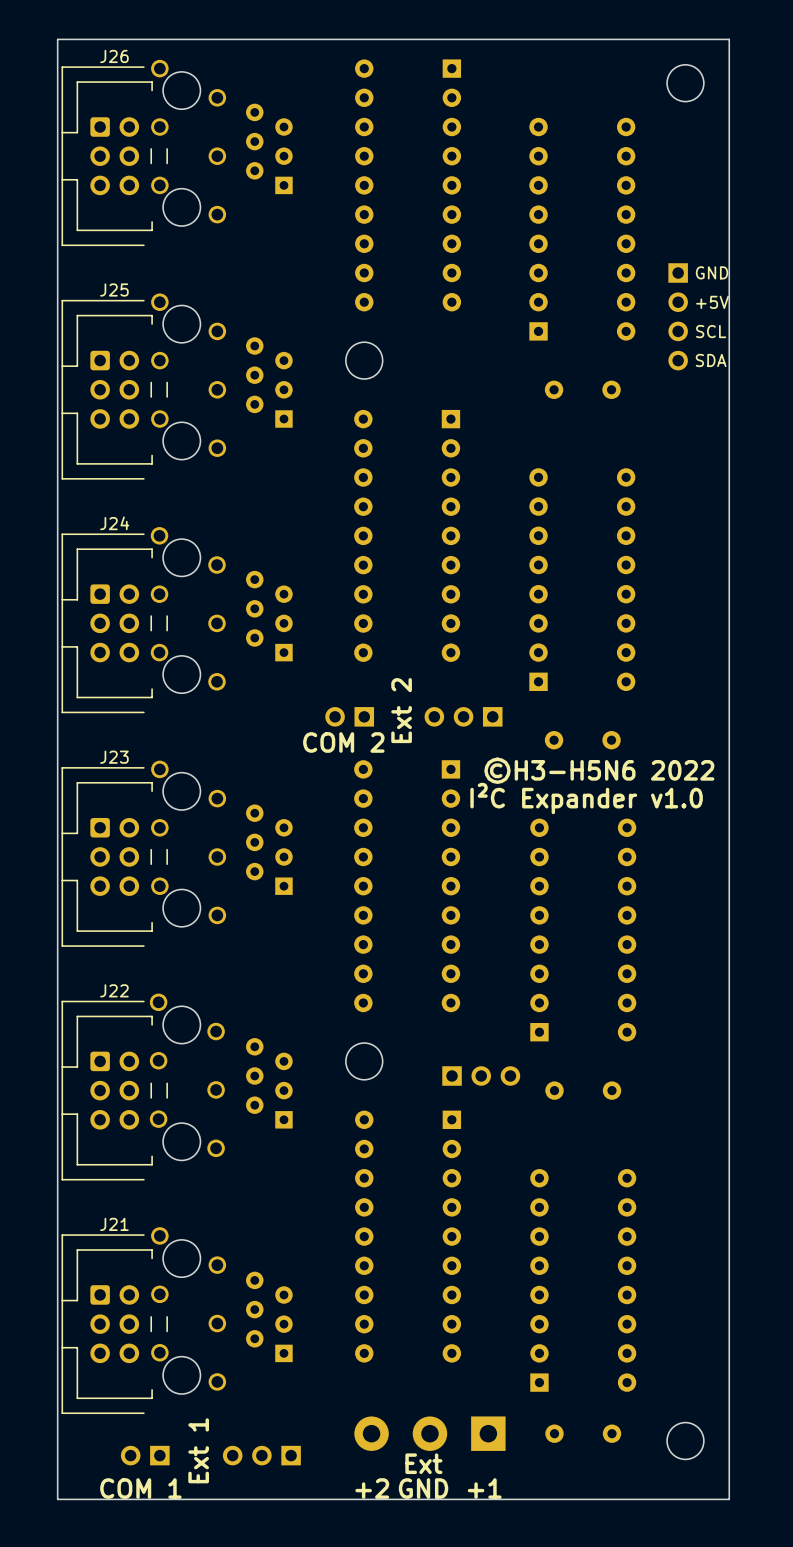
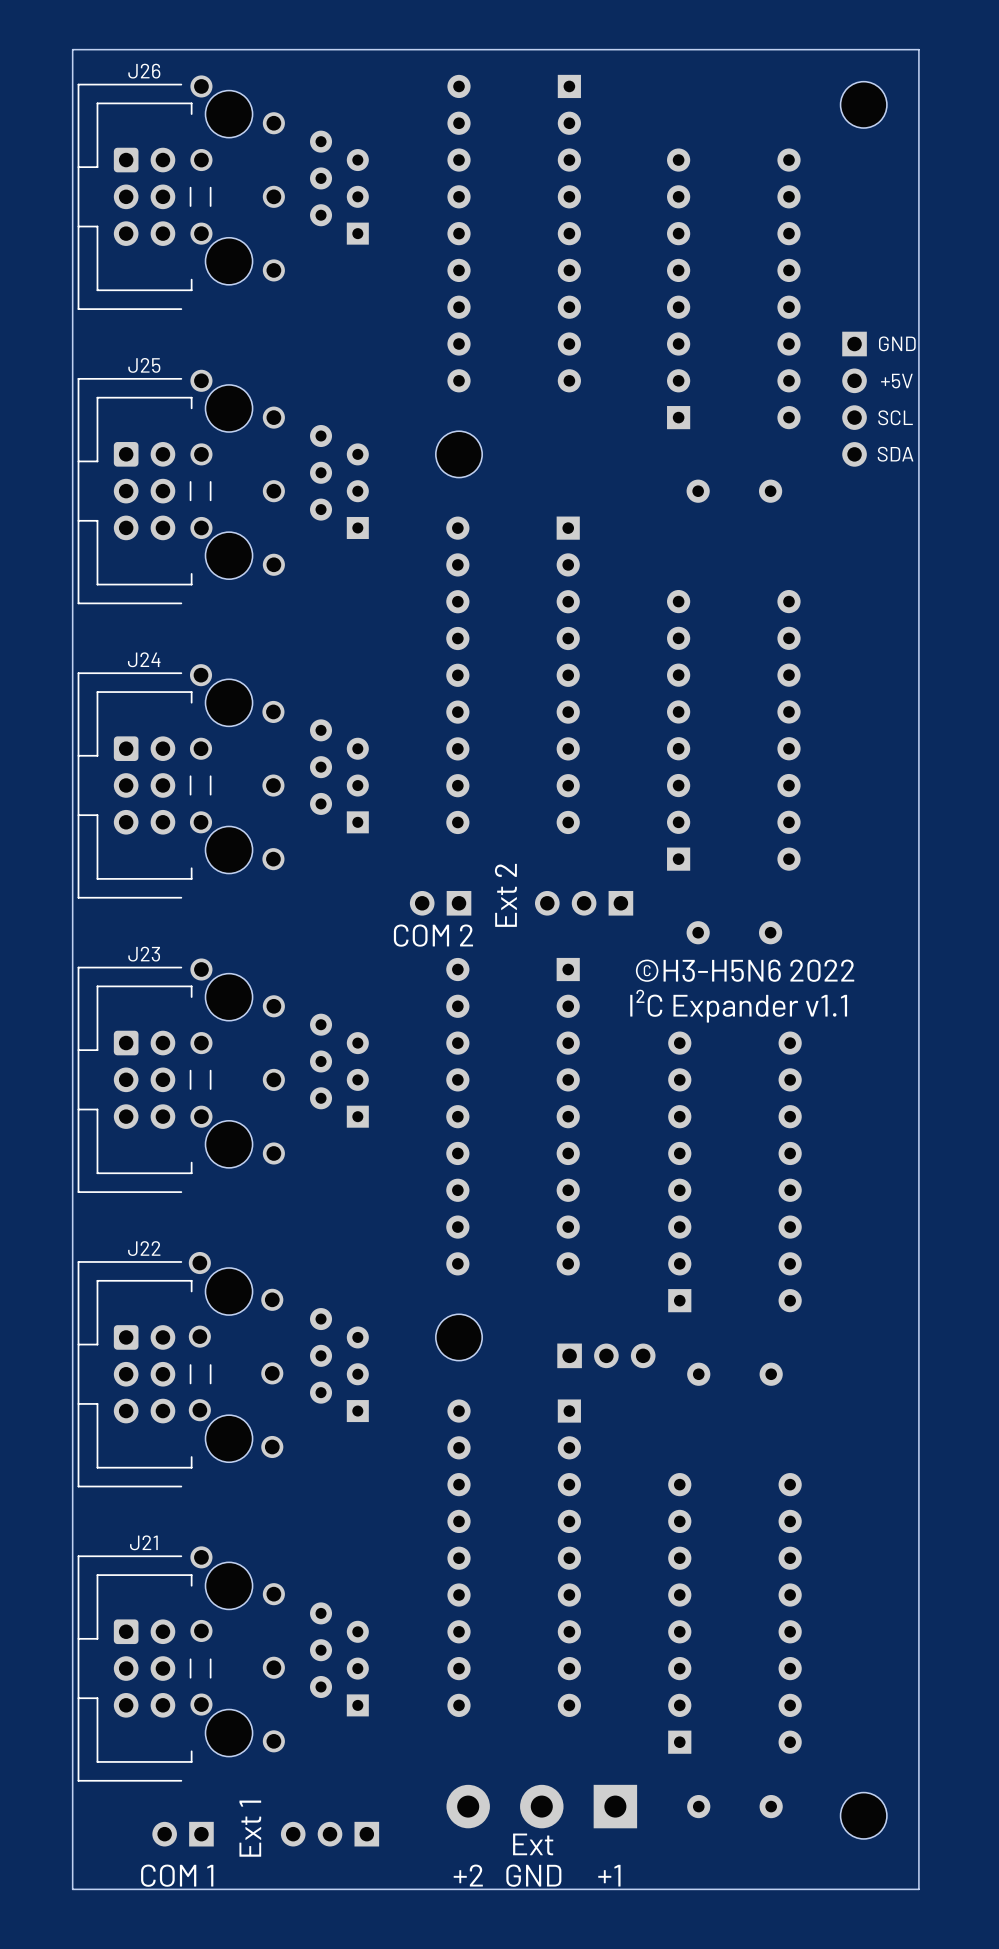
text: I²C Expander v1.0 (586, 798) -> I²C Expander v1.1 (738, 1006)

